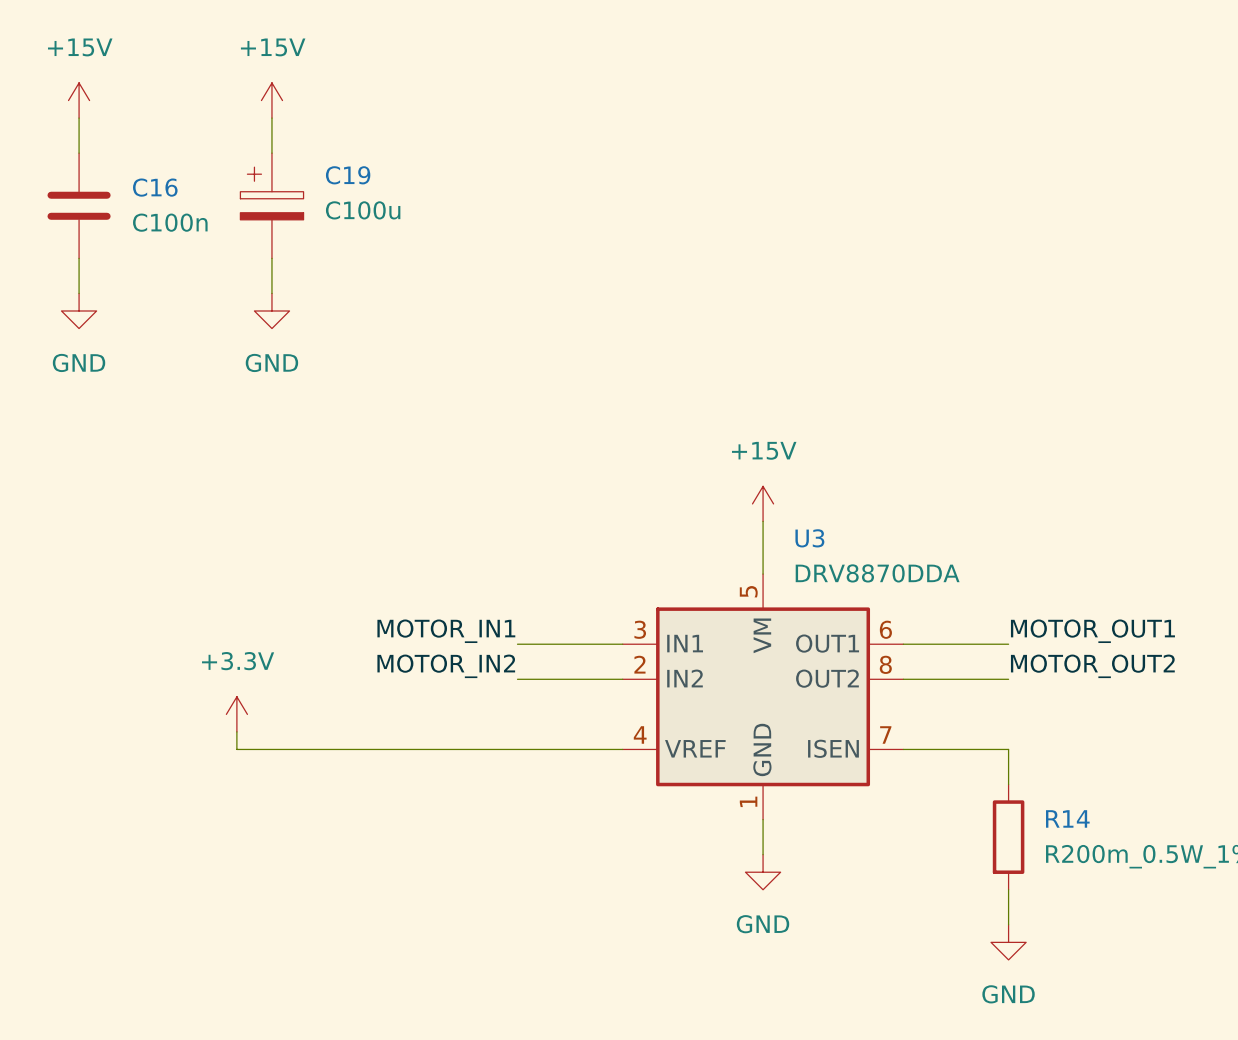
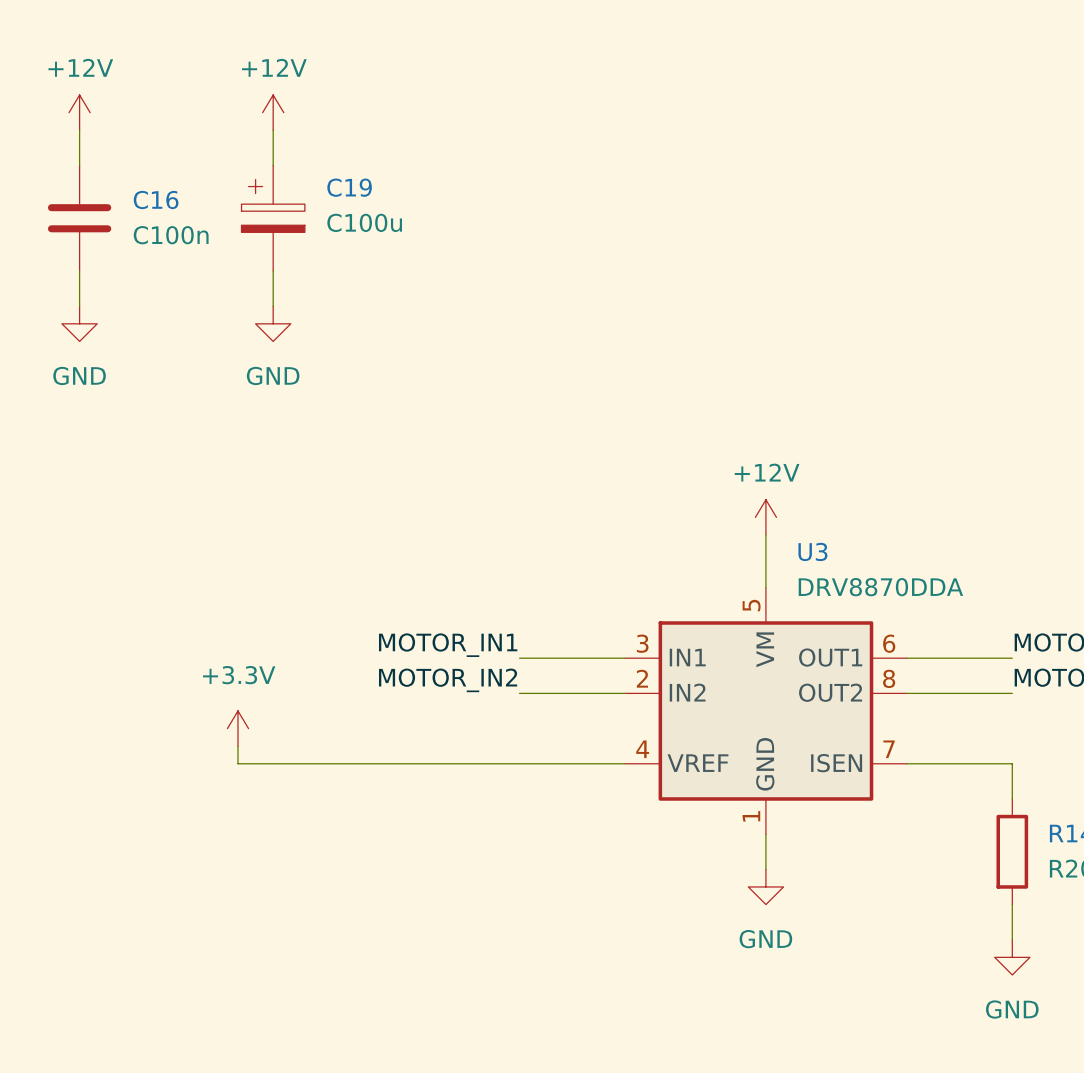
power symbol: +15V (79, 100) -> +12V (79, 112)
power symbol: +15V (271, 100) -> +12V (273, 112)
power symbol: +15V (763, 503) -> +12V (765, 517)

